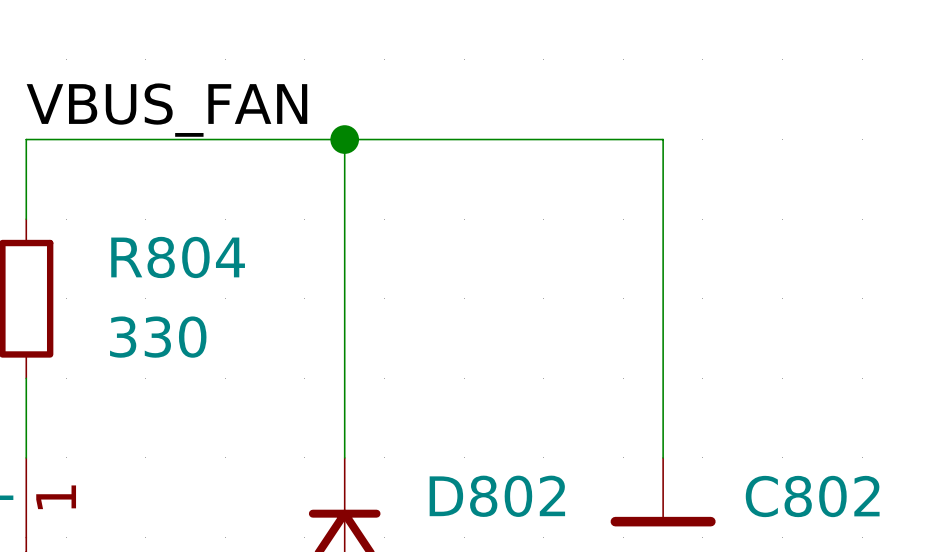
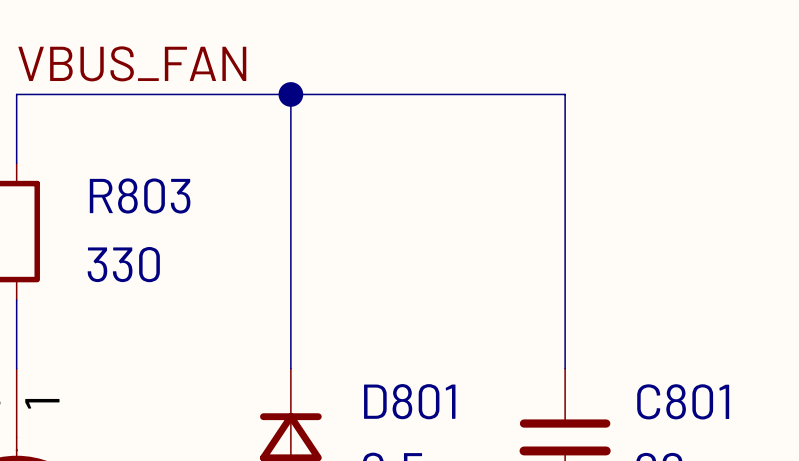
R804 name: R804 (178, 257) -> R803 (140, 196)
D802 name: D802 (497, 496) -> D801 (409, 401)
C802 name: C802 (812, 496) -> C801 (683, 401)

